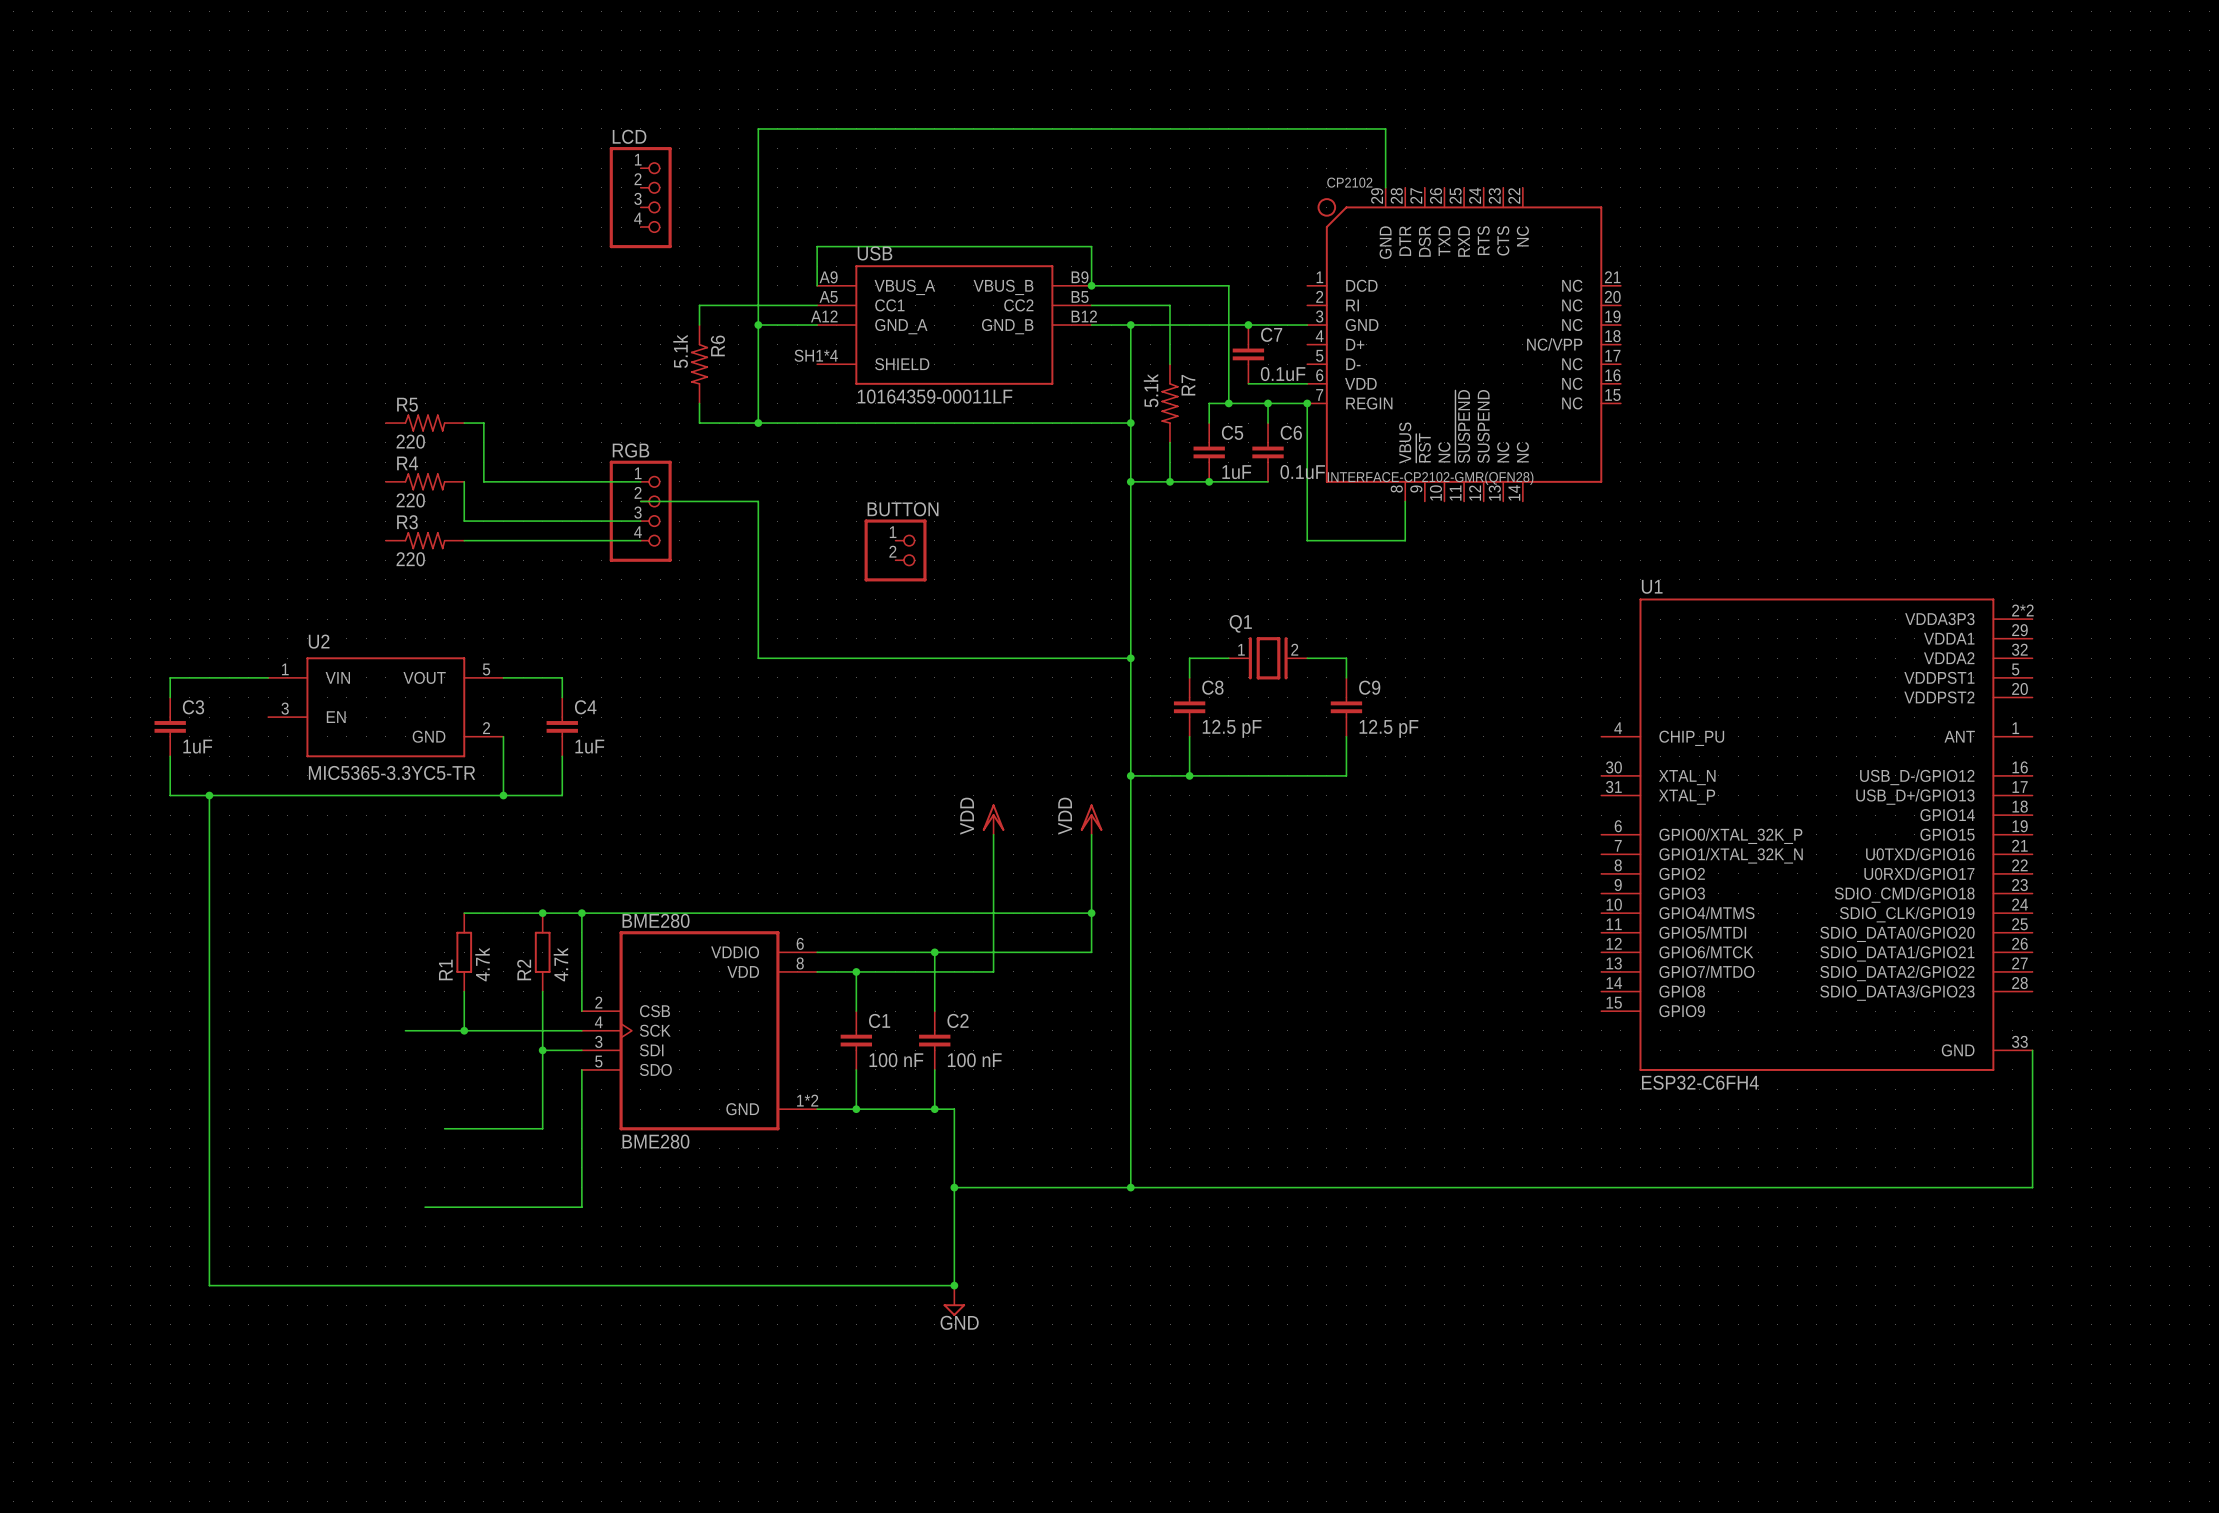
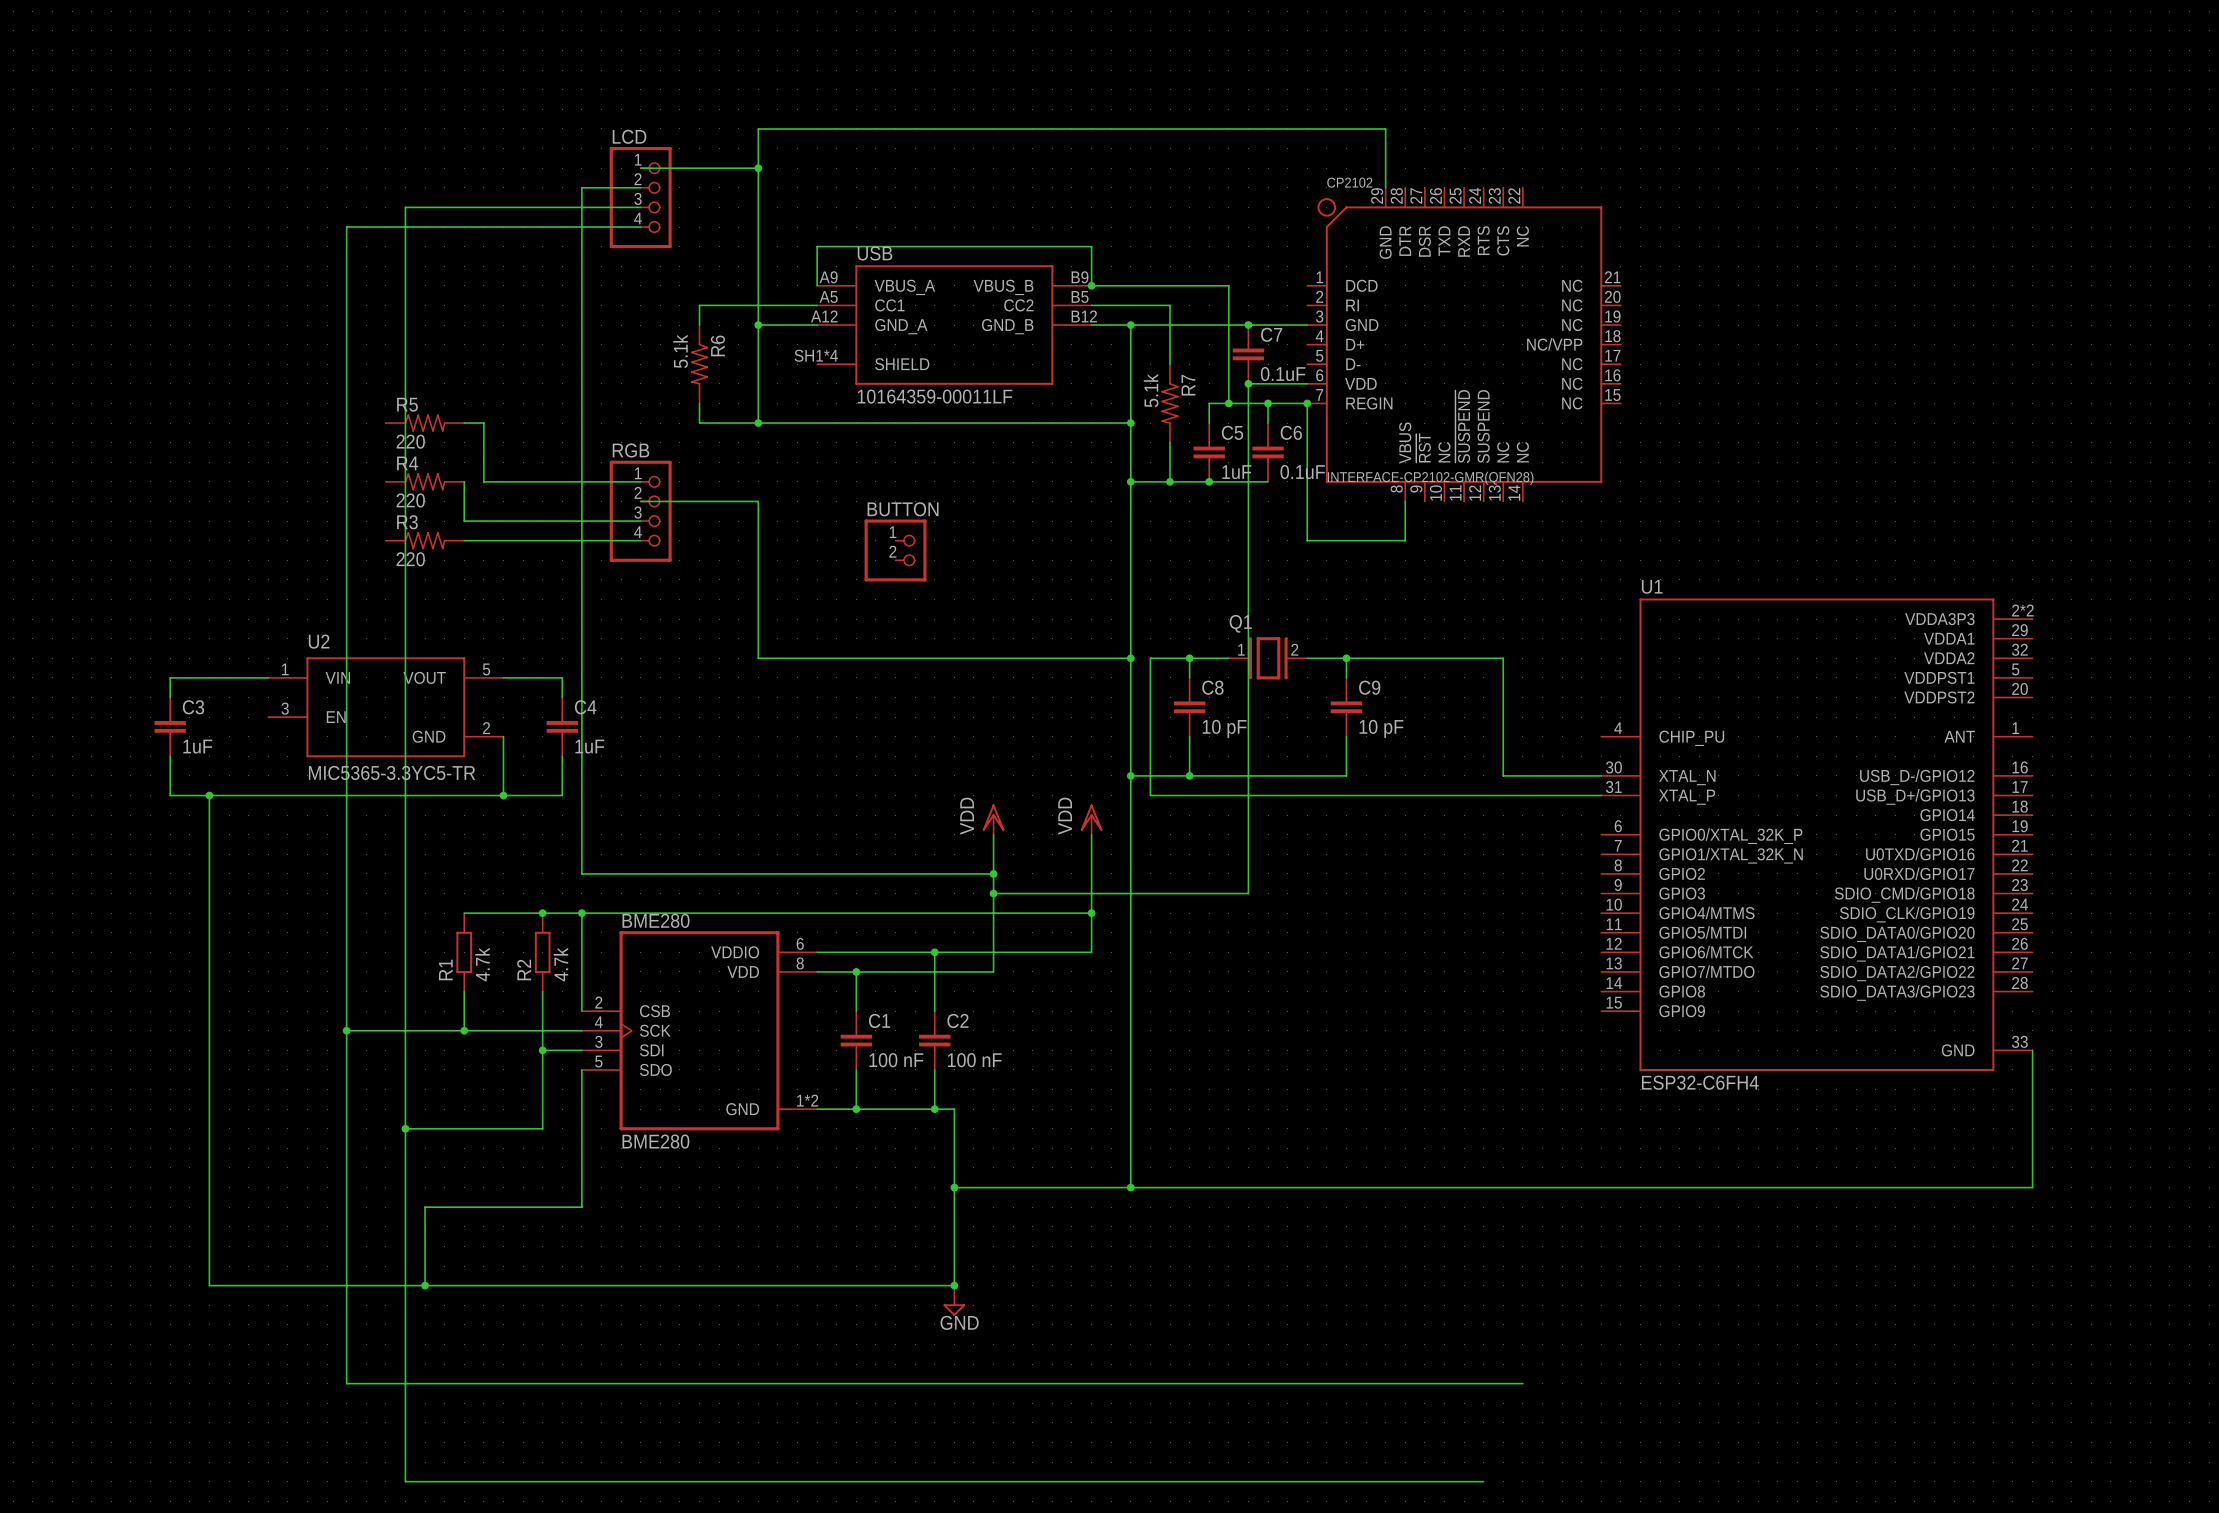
wire: none -> (640, 168) (758, 168)
junction: none -> (758, 168)
wire: none -> (640, 187) (581, 187) (581, 873) (993, 873)
wire: none -> (640, 207) (405, 207) (405, 1481) (1483, 1481)
wire: none -> (640, 227) (346, 227) (346, 1383) (1522, 1383)
wire: none -> (1248, 383) (1248, 893) (993, 893)
junction: none -> (1248, 383)
wire: none -> (1189, 658) (1150, 658) (1150, 795) (1601, 795)
junction: none -> (1189, 658)
wire: none -> (1346, 658) (1503, 658) (1503, 775) (1601, 775)
junction: none -> (1346, 658)
C8 value: 12.5 pF (1232, 728) -> 10 pF (1224, 728)
C9 value: 12.5 pF (1388, 728) -> 10 pF (1381, 728)
junction: none -> (993, 873)
junction: none -> (993, 893)
wire: none -> (346, 1030) (405, 1030)
junction: none -> (346, 1030)
wire: none -> (405, 1128) (444, 1128)
junction: none -> (405, 1128)
wire: none -> (425, 1207) (425, 1285)
junction: none -> (425, 1285)

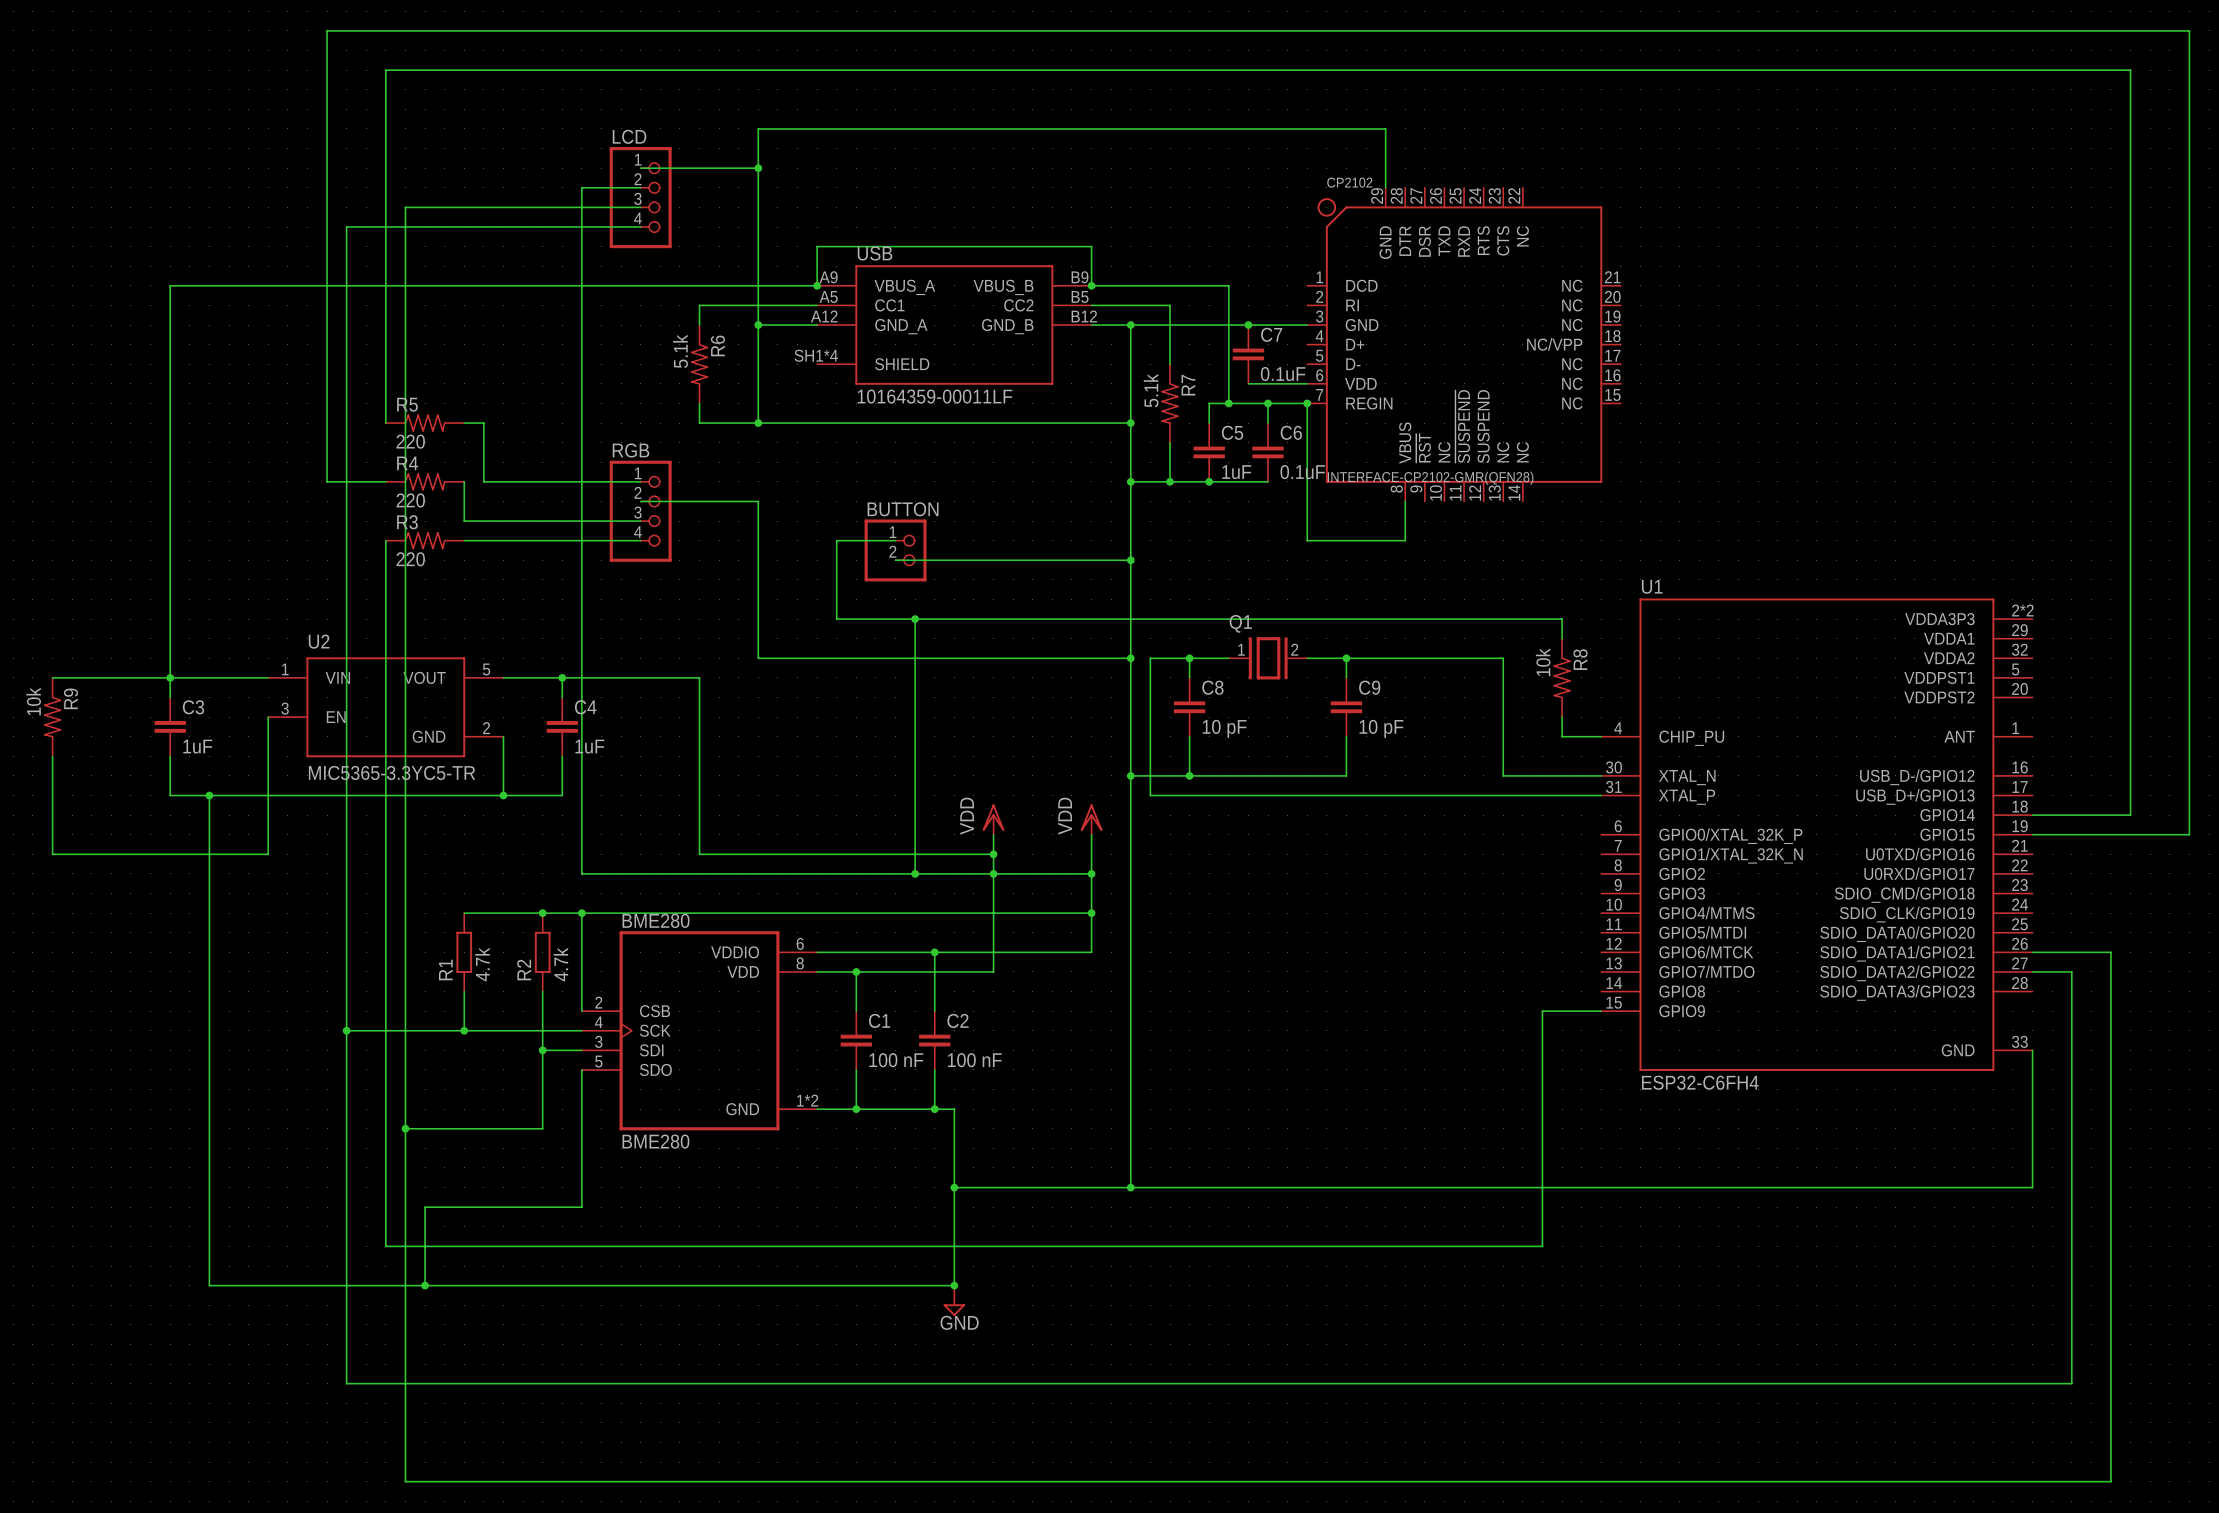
wire: none -> (817, 285) (170, 285) (170, 677) (52, 677)
junction: none -> (817, 285)
wire: (1248, 383) (1248, 893) (993, 893) -> none
junction: (1248, 383) -> none
wire: none -> (385, 423) (385, 70) (2130, 70) (2130, 815) (2032, 815)
wire: none -> (385, 481) (327, 481) (327, 30) (2189, 30) (2189, 834) (2032, 834)
wire: none -> (385, 540) (385, 1246) (1542, 1246) (1542, 1011) (1601, 1011)
wire: none -> (895, 540) (836, 540) (836, 619) (1562, 619) (1562, 638)
wire: none -> (895, 560) (1130, 560)
junction: none -> (1130, 560)
wire: none -> (915, 619) (915, 873)
junction: none -> (915, 619)
junction: none -> (170, 677)
wire: none -> (562, 677) (699, 677) (699, 854) (993, 854)
junction: none -> (562, 677)
R8: none -> 10k (1562, 677)
R9: none -> 10k (52, 717)
wire: none -> (268, 717) (268, 854) (52, 854) (52, 756)
wire: none -> (1562, 717) (1562, 736) (1601, 736)
junction: none -> (915, 873)
wire: none -> (993, 873) (1091, 873)
junction: none -> (1091, 873)
junction position: (993, 893) -> (993, 854)
wire: none -> (2032, 952) (2110, 952) (2110, 1481) (1483, 1481)
wire: none -> (2032, 971) (2071, 971) (2071, 1383) (1522, 1383)

